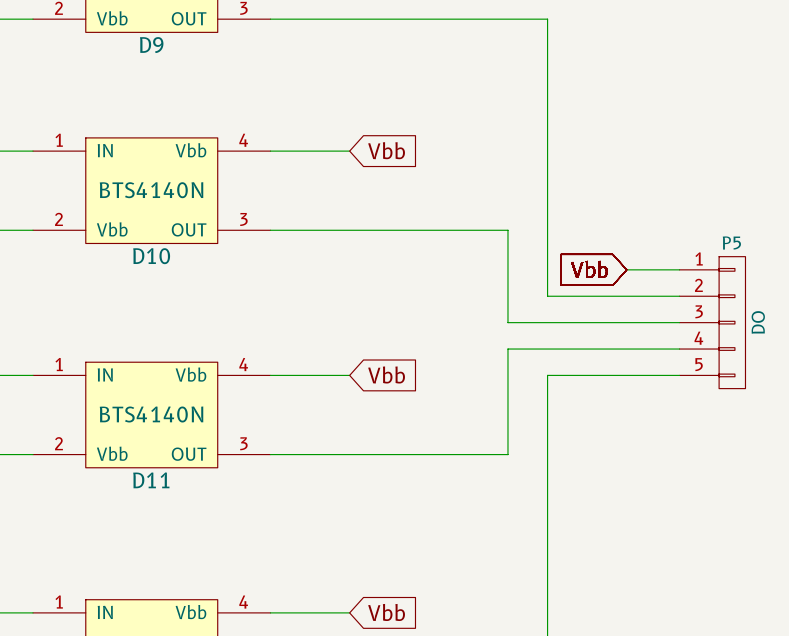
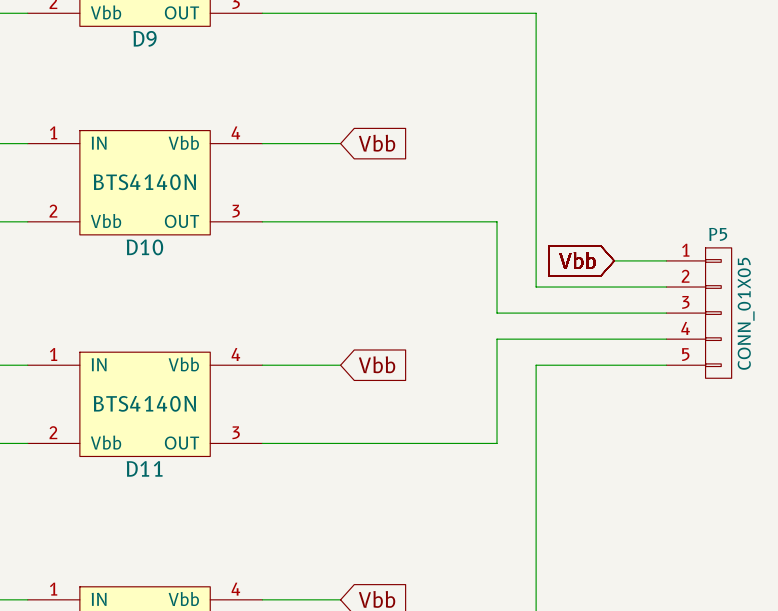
P5 value: DO (758, 322) -> CONN_01X05 (746, 313)

